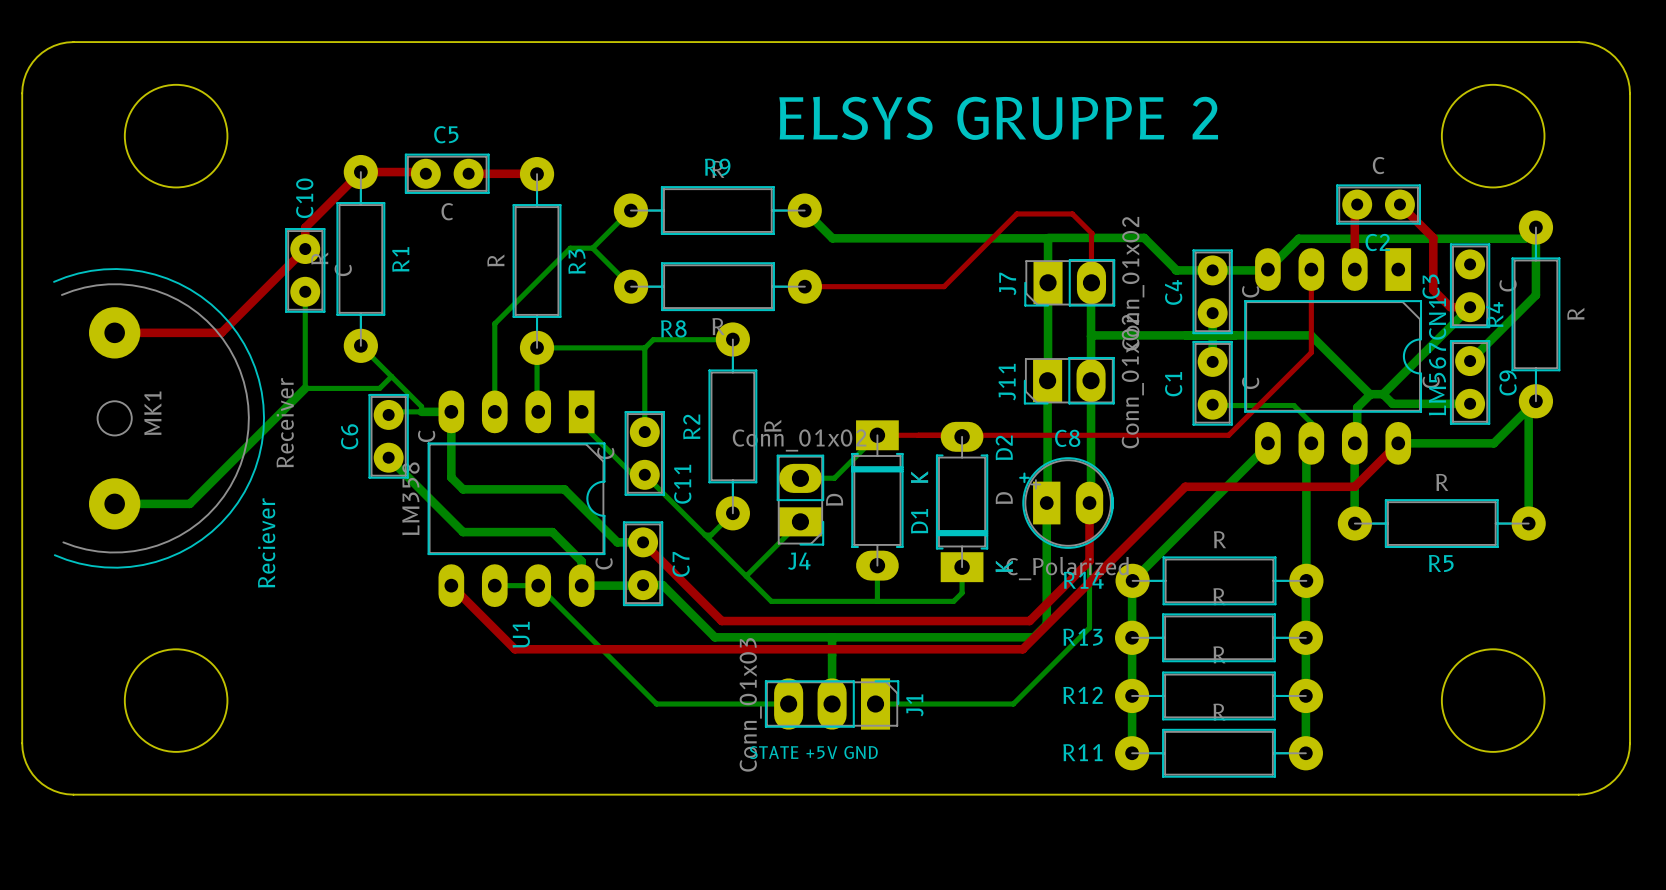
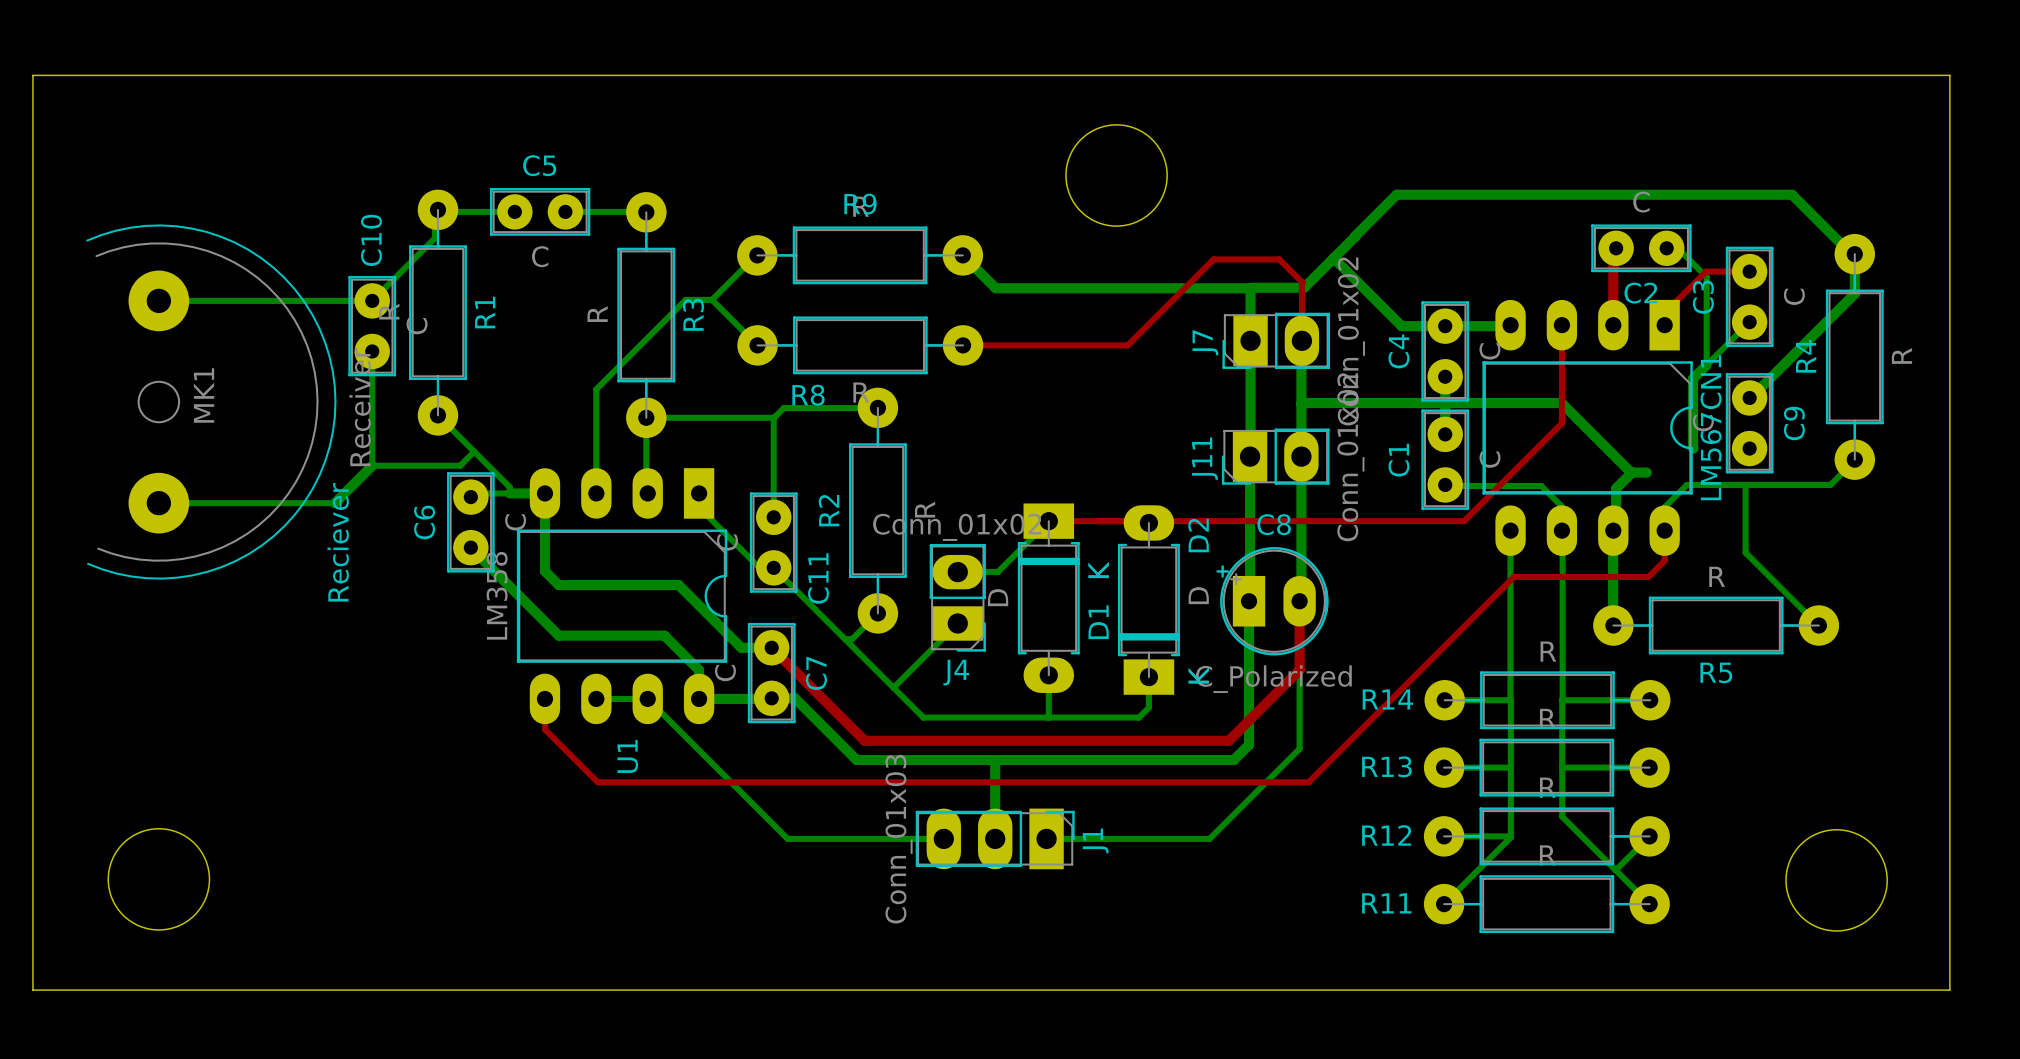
board edge: (73, 42) (1578, 42) (1598, 45) (1609, 52) (1619, 62) (1626, 73) (1630, 93) (1630, 743) (1626, 762) (1614, 779) (1604, 787) (1591, 792) (1578, 794) (73, 794) (53, 790) (37, 779) (29, 769) (23, 756) (22, 743) (22, 93) (26, 73) (37, 57) (53, 45) (73, 42) -> (32, 75) (32, 990) (1949, 990) (1949, 75) (32, 75)
round board edge: [124, 84, 228, 188] -> none
round board edge: [1441, 84, 1545, 188] -> none
round board edge: none -> [1065, 124, 1168, 227]
text: ELSYS GRUPPE 2 (998, 118) -> none
bottom track: none -> (440, 211) (514, 211)
top track: (425, 173) (424, 172) (360, 172) (305, 227) (305, 249) (221, 332) (114, 332) -> none
top track: (468, 173) (537, 174) -> none
bottom track: none -> (565, 211) (645, 211)
bottom track: none -> (434, 212) (434, 238) (372, 300) (158, 300)
bottom track: none -> (1666, 237) (1706, 277) (1706, 365)
top track: (1399, 204) (1433, 237) (1433, 290) (1450, 307) (1470, 307) -> none
bottom track: none -> (1333, 258) (1401, 326)
top track: none -> (1749, 271) (1706, 271) (1664, 313)
bottom track: (1093, 237) (1144, 237) (1176, 270) -> (1304, 287) (1396, 194) (1792, 194) (1851, 254) (1854, 254) (1854, 293) (1749, 397)
bottom track: none -> (1749, 322) (1706, 365)
bottom track: (1267, 269) (1298, 238) (1524, 238) (1535, 227) (1535, 295) (1470, 361) -> none
C3 position: (1470, 285) -> (1749, 296)
bottom track: none -> (1706, 365) (1692, 378) (1693, 448)
bottom track: (1470, 307) (1383, 394) (1392, 403) (1470, 403) -> none
R4 position: (1535, 314) -> (1854, 356)
C9 position: (1470, 382) -> (1749, 423)
bottom track: (1535, 401) (1493, 443) (1398, 443) -> (1854, 459) (1830, 484) (1686, 484) (1664, 507) (1664, 530)
bottom track: (1528, 408) (1528, 523) -> (1745, 484) (1745, 552) (1818, 625)
MK1 position: (159, 418) -> (211, 402)
bottom track: (273, 420) (189, 503) (114, 503) -> (334, 503) (158, 503)
bottom track: (1267, 443) (1267, 445) (1132, 581) (1132, 753) -> (1510, 530) (1510, 700)
bottom track: (1311, 443) (1306, 448) (1305, 753) -> none
bottom track: none -> (1562, 531) (1562, 700)
top track: (1398, 443) (1354, 486) (1185, 486) (1022, 649) (514, 649) (451, 585) -> (1664, 530) (1664, 560) (1648, 576) (1513, 576) (1308, 782) (597, 782) (544, 729) (544, 698)
R14 position: (1219, 580) -> (1547, 700)
bottom track: none -> (1444, 700) (1510, 700)
bottom track: none -> (1510, 700) (1510, 837)
bottom track: none -> (1562, 700) (1562, 816) (1649, 904)
bottom track: none -> (1562, 700) (1650, 700)
R13 position: (1218, 637) -> (1546, 767)
bottom track: none -> (1444, 767) (1510, 768)
bottom track: none -> (1562, 767) (1649, 767)
round board edge: [124, 648, 228, 753] -> none
round board edge: [1441, 648, 1545, 753] -> none
round board edge: none -> [107, 828, 210, 931]
R12 position: (1218, 695) -> (1546, 836)
round board edge: none -> [1785, 829, 1888, 932]
bottom track: none -> (1444, 836) (1510, 837)
bottom track: none -> (1649, 836) (1615, 869)
bottom track: none -> (1510, 837) (1444, 904)
text: STATE +5V GND (813, 752) -> none
R11 position: (1218, 753) -> (1546, 904)

